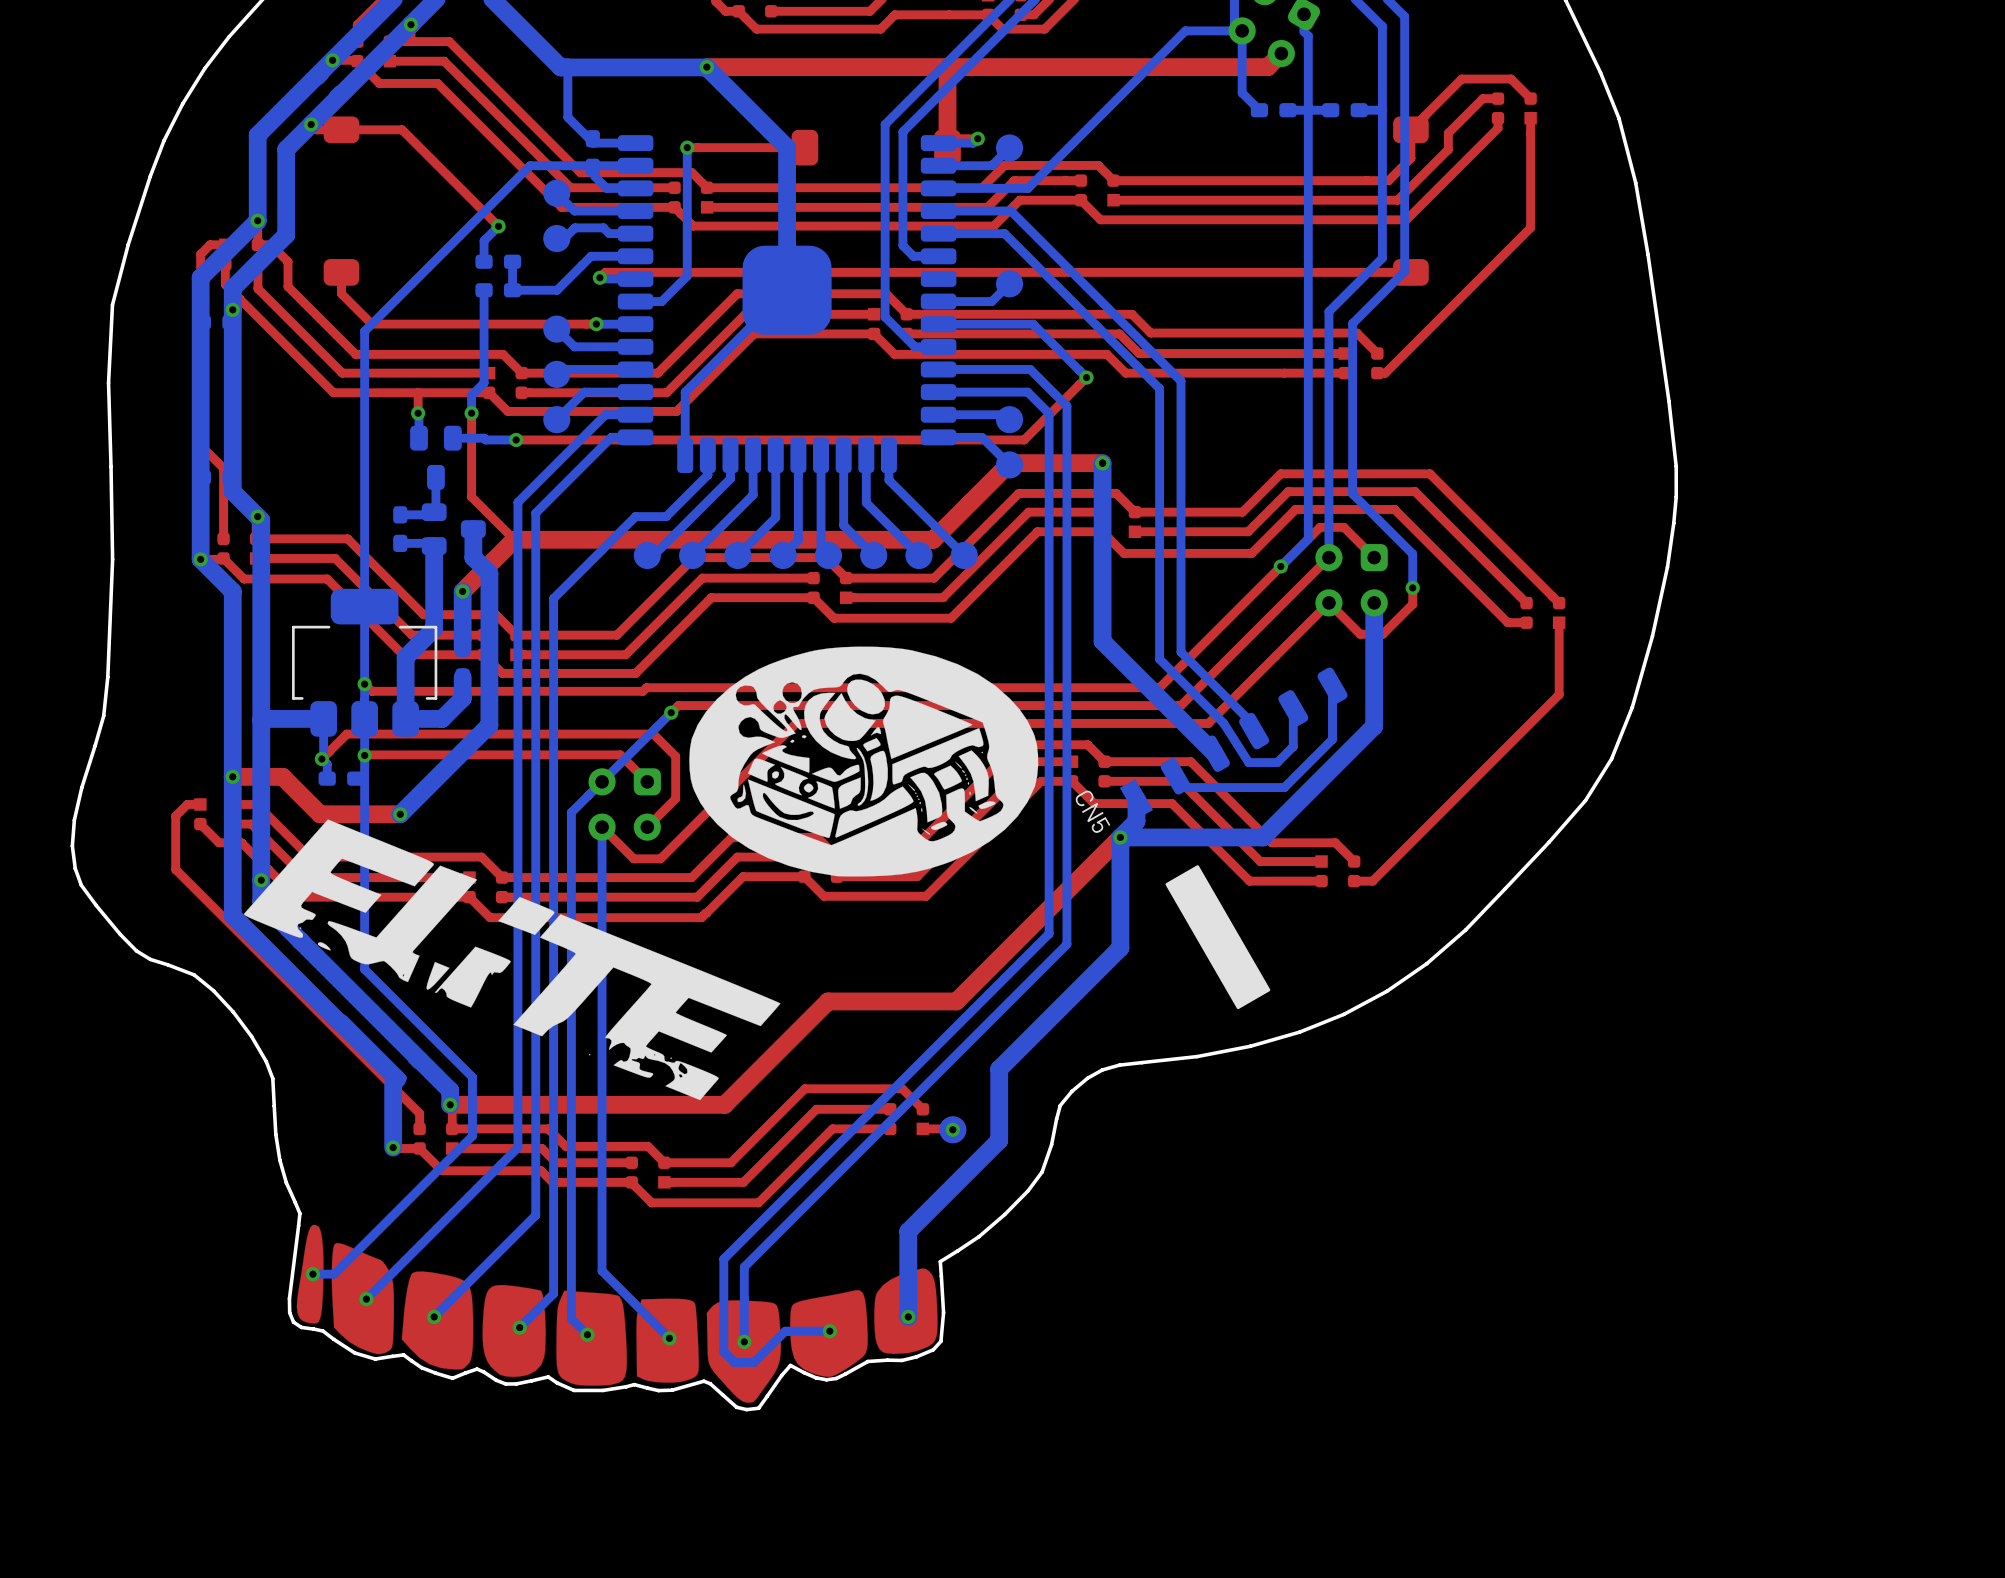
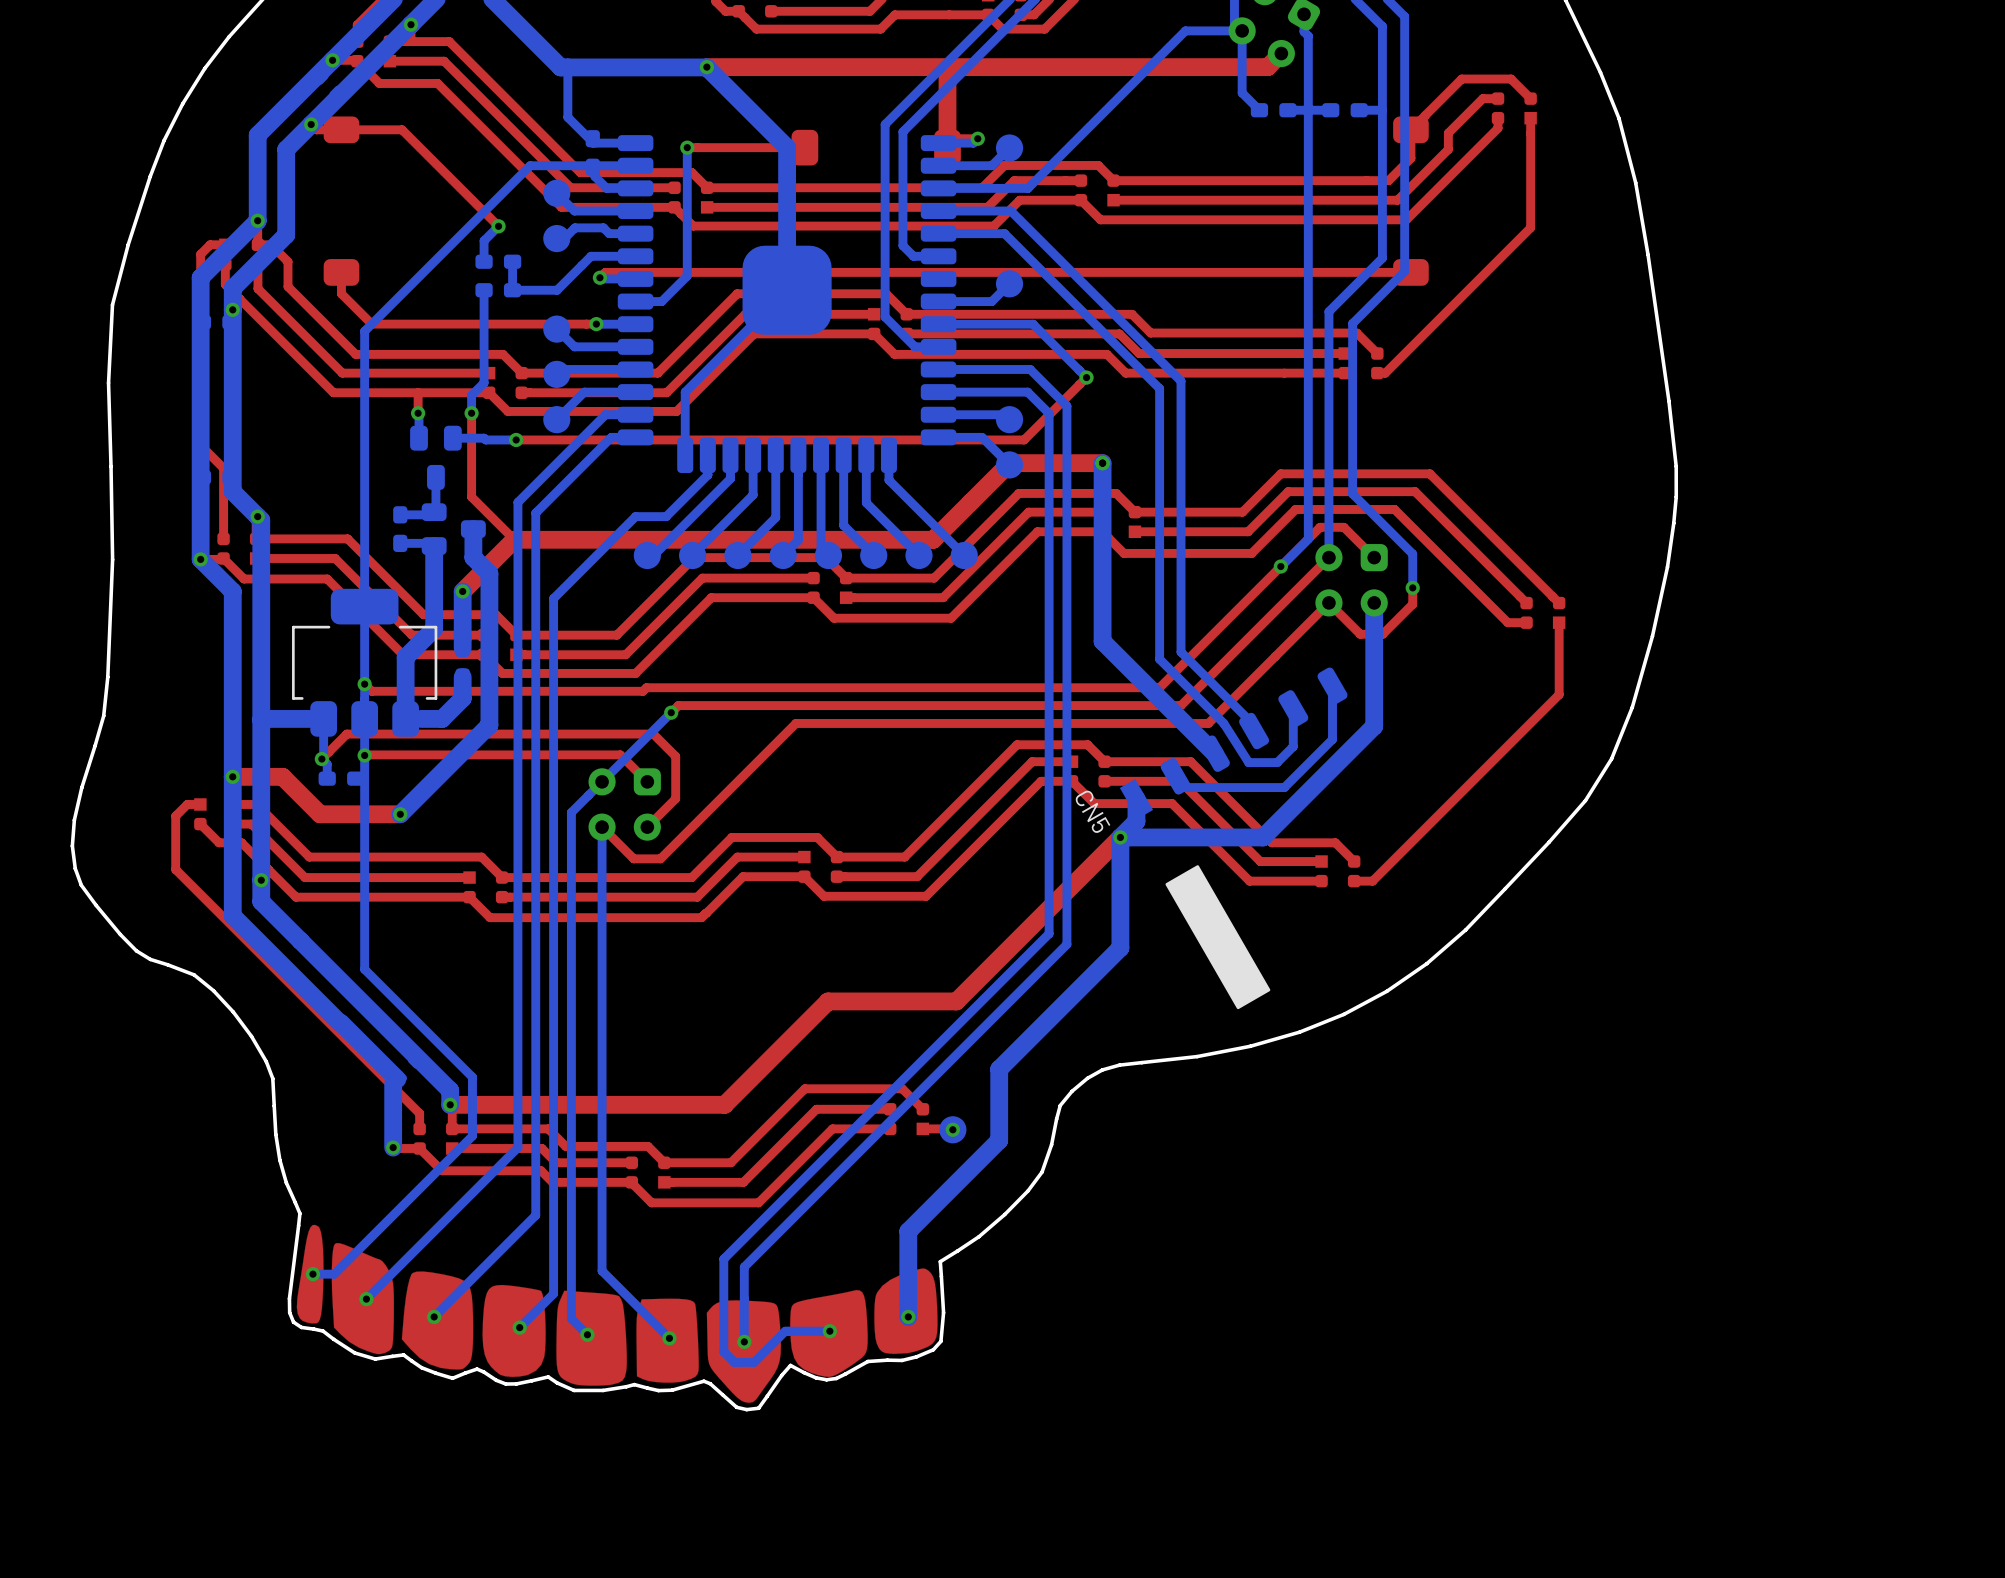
drawing: [243, 646, 1039, 1101] -> none

